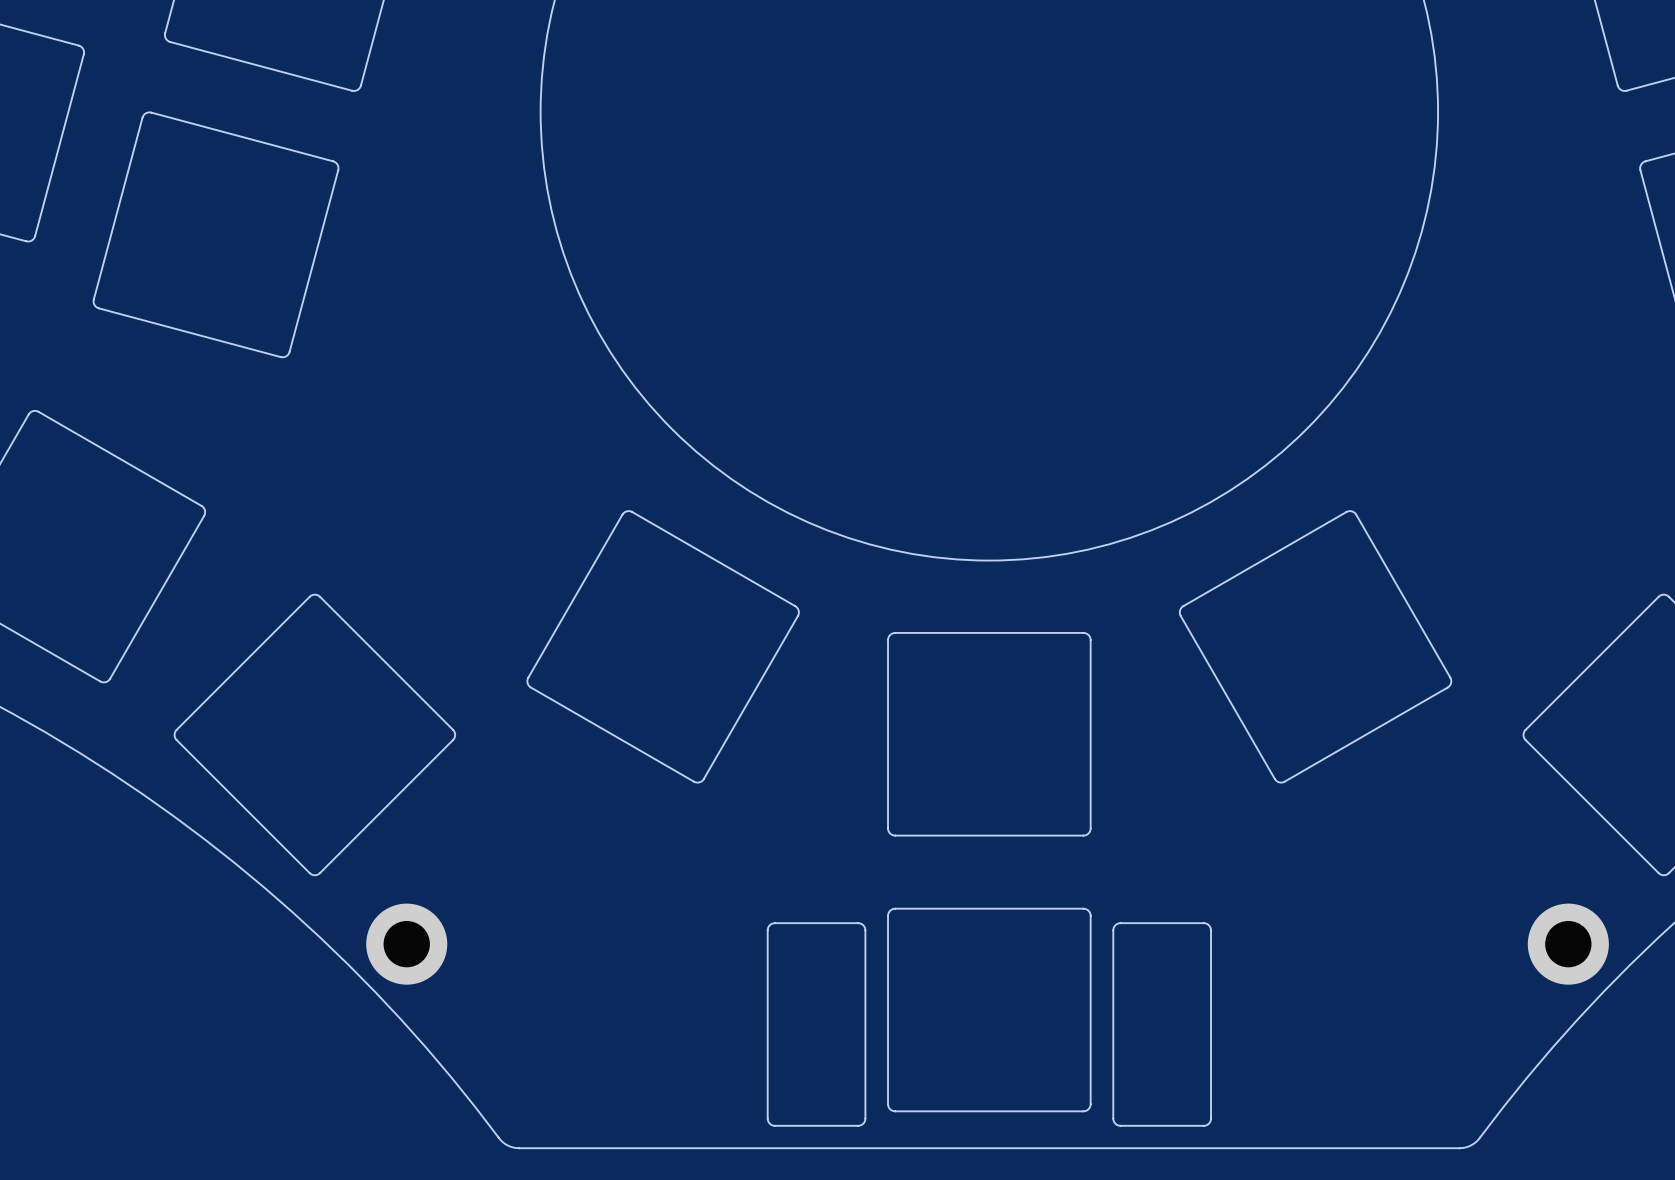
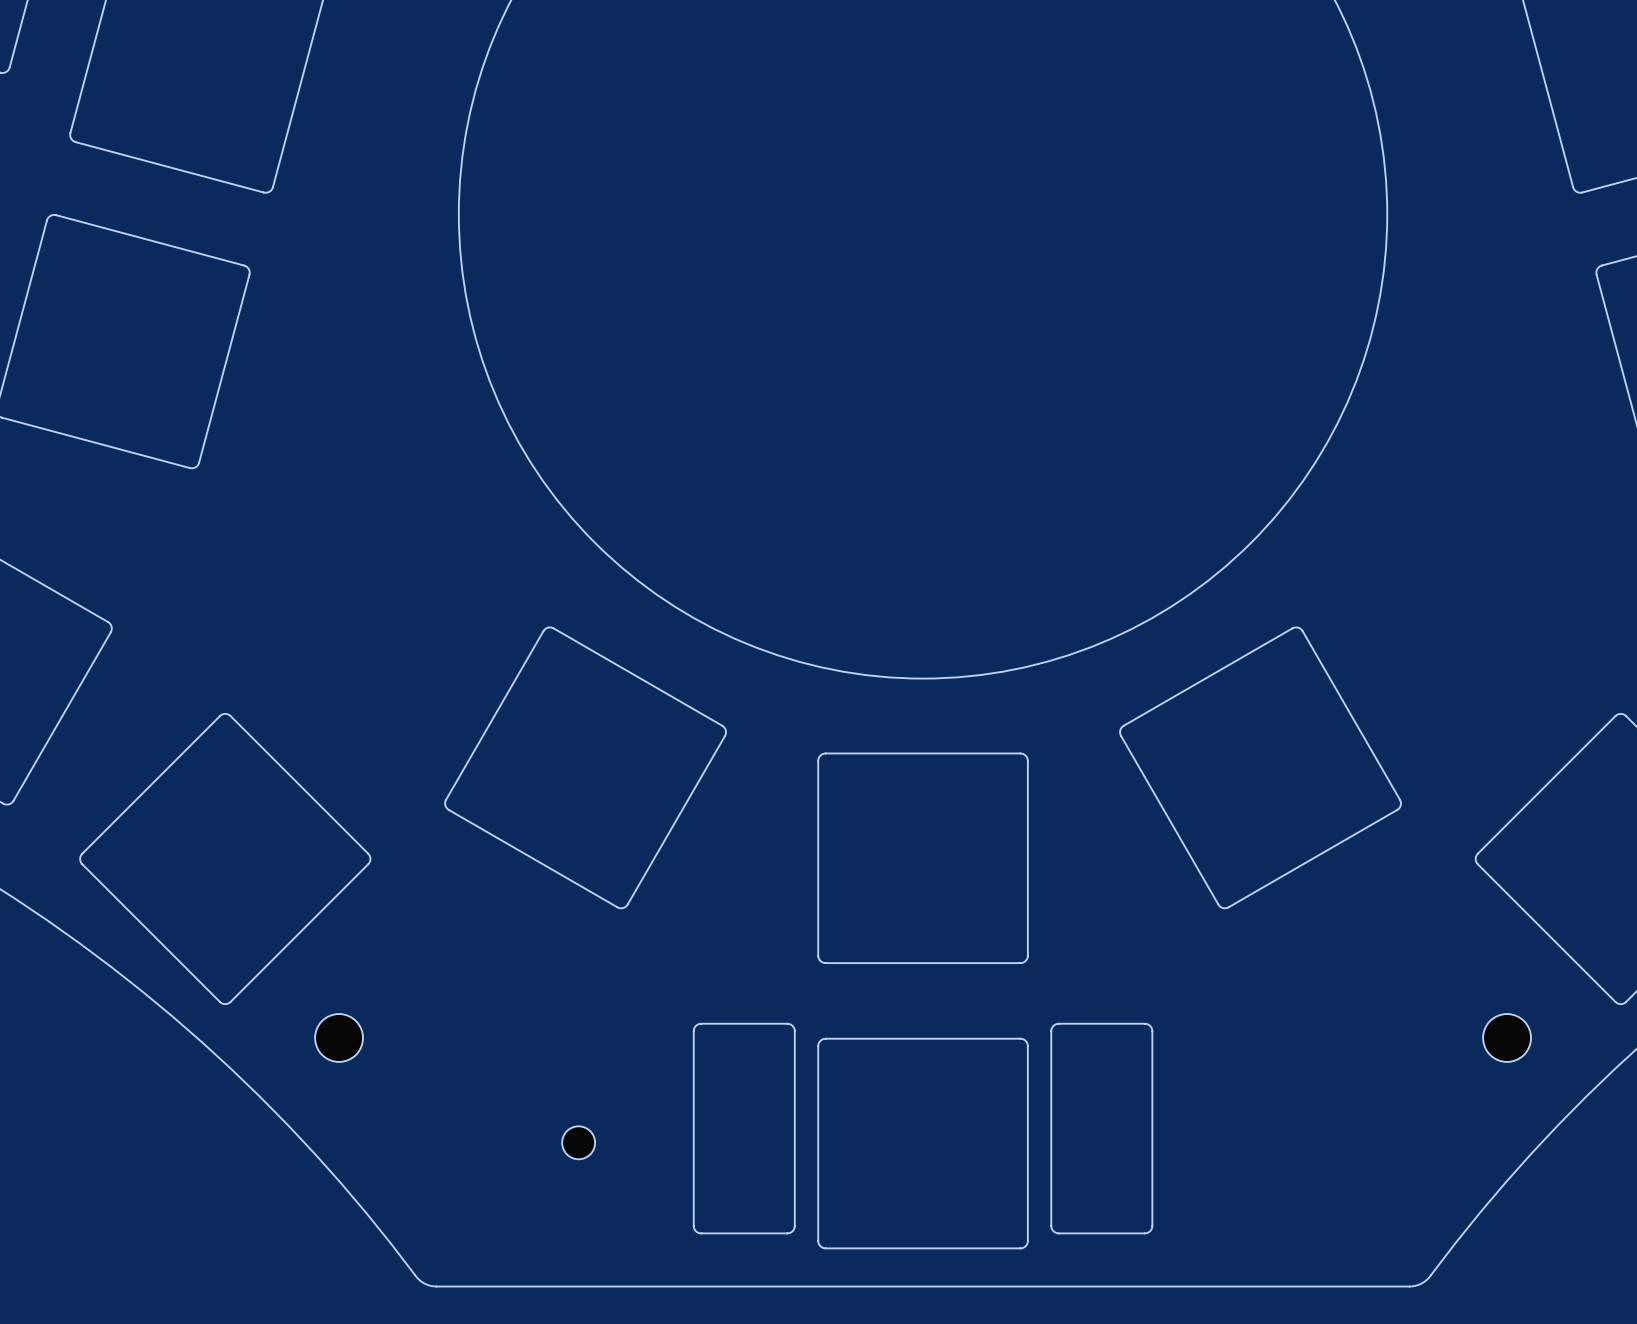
part: none -> (339, 1037)
drawing shape: [766, 907, 1212, 1127] -> [692, 1023, 1154, 1250]
part: none -> (1507, 1037)
part: (406, 944) -> none
part: (1568, 944) -> none
part: none -> (578, 1142)

